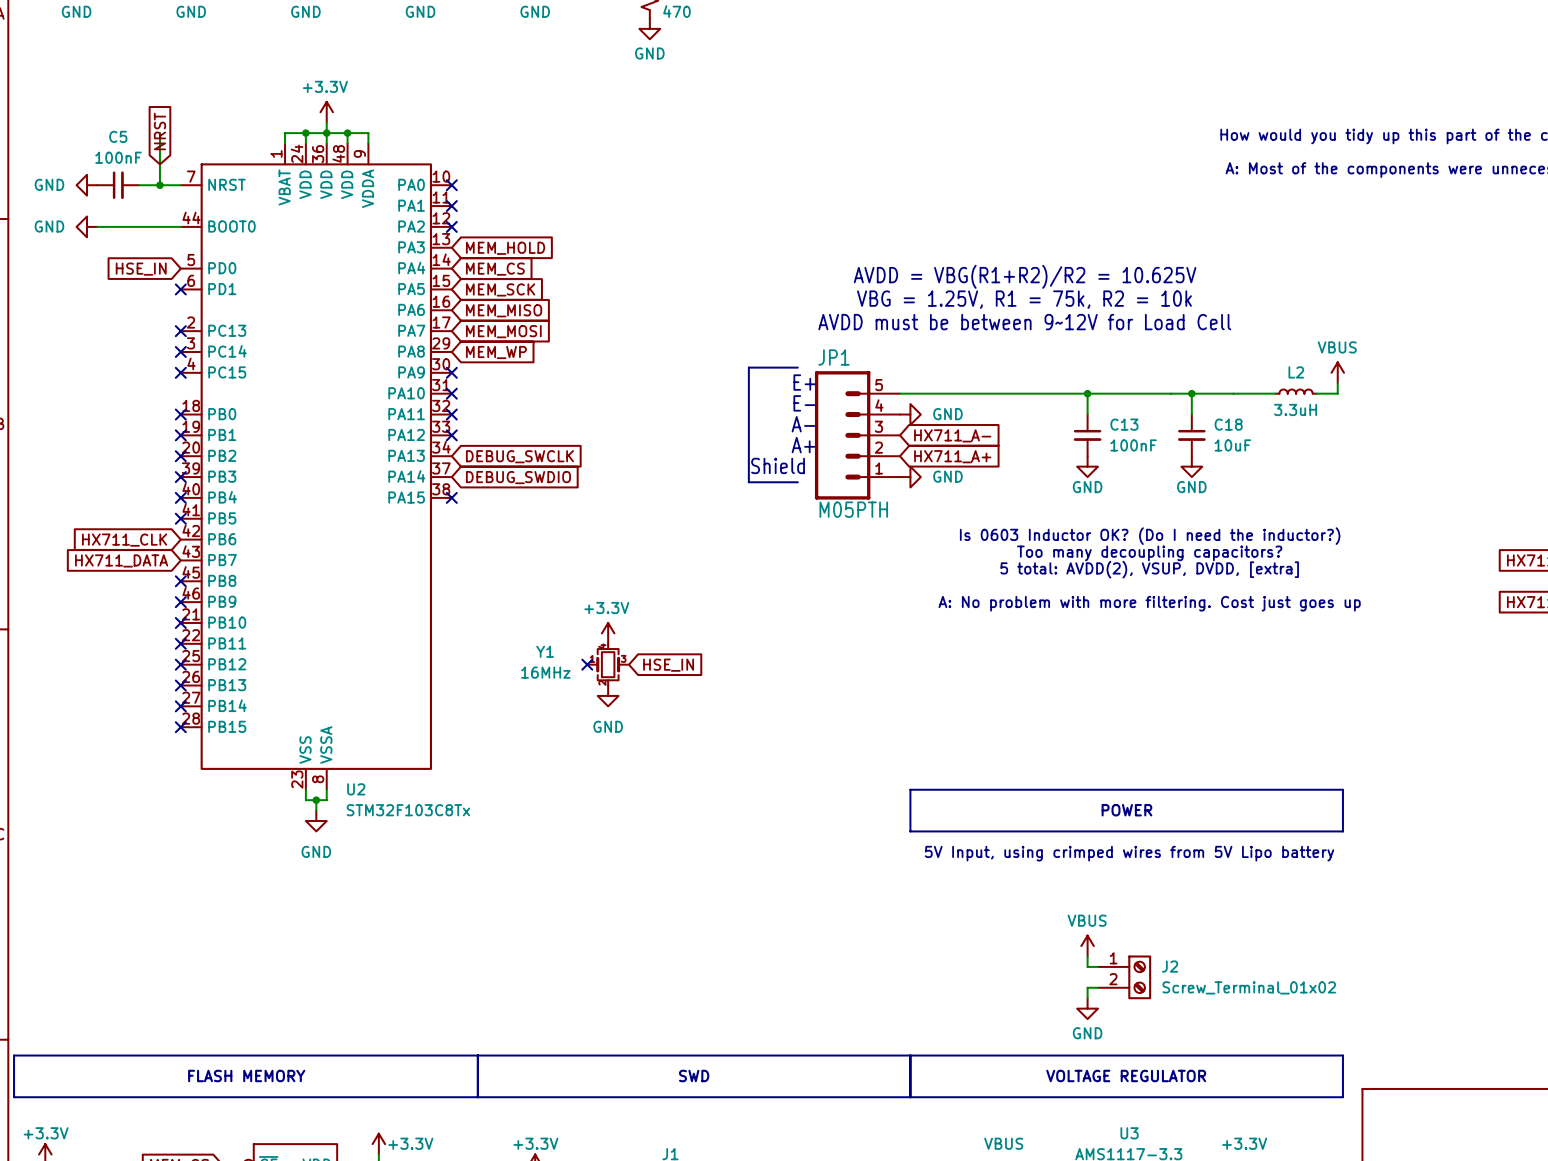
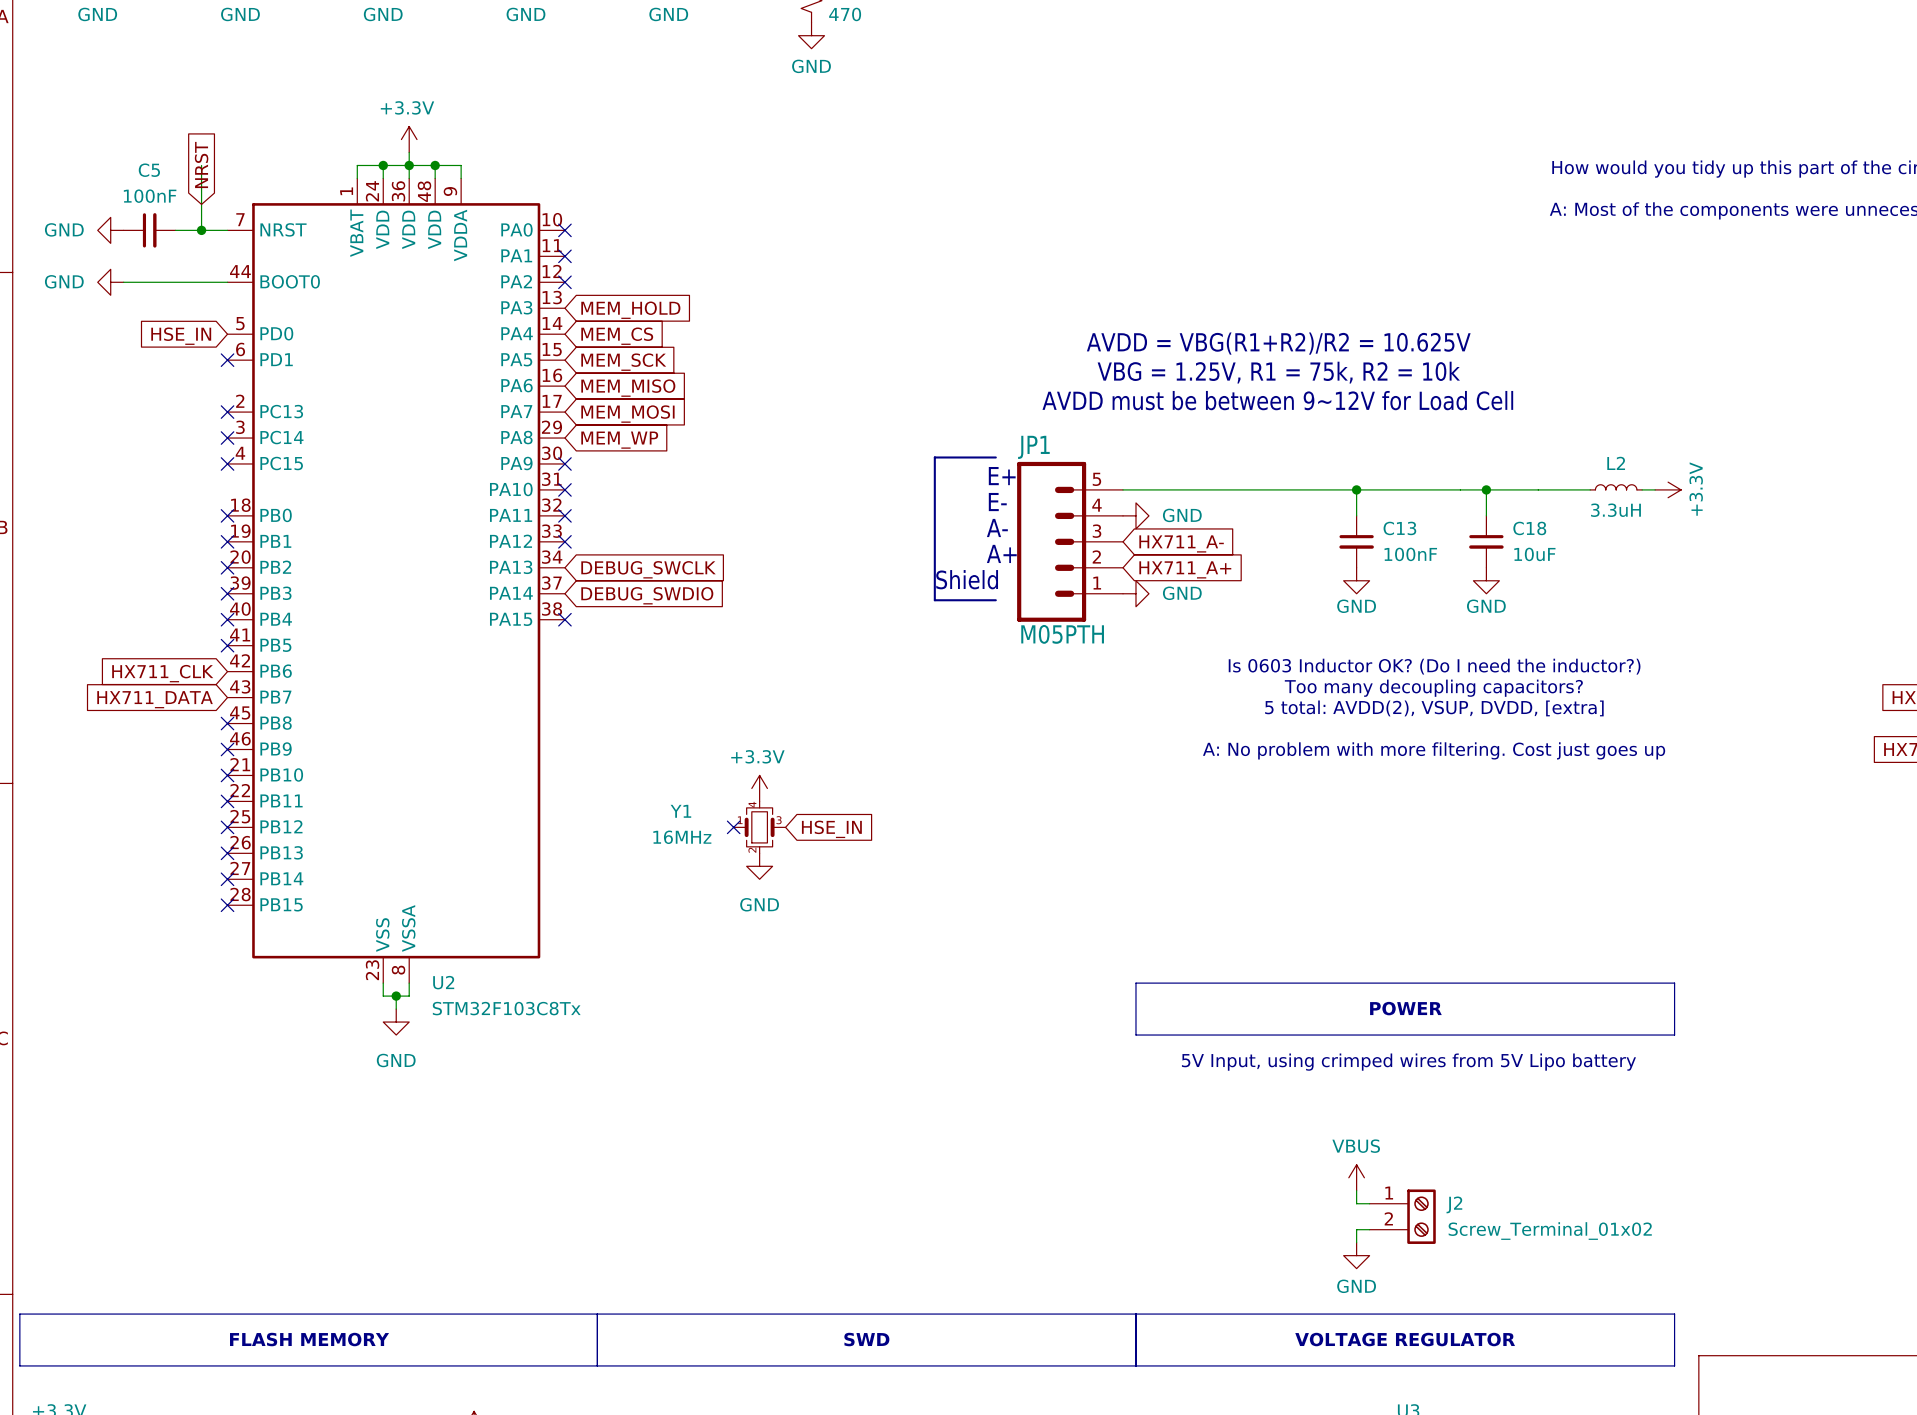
power symbol: VBUS (1337, 372) -> none
power symbol: none -> +3.3V (1668, 489)

